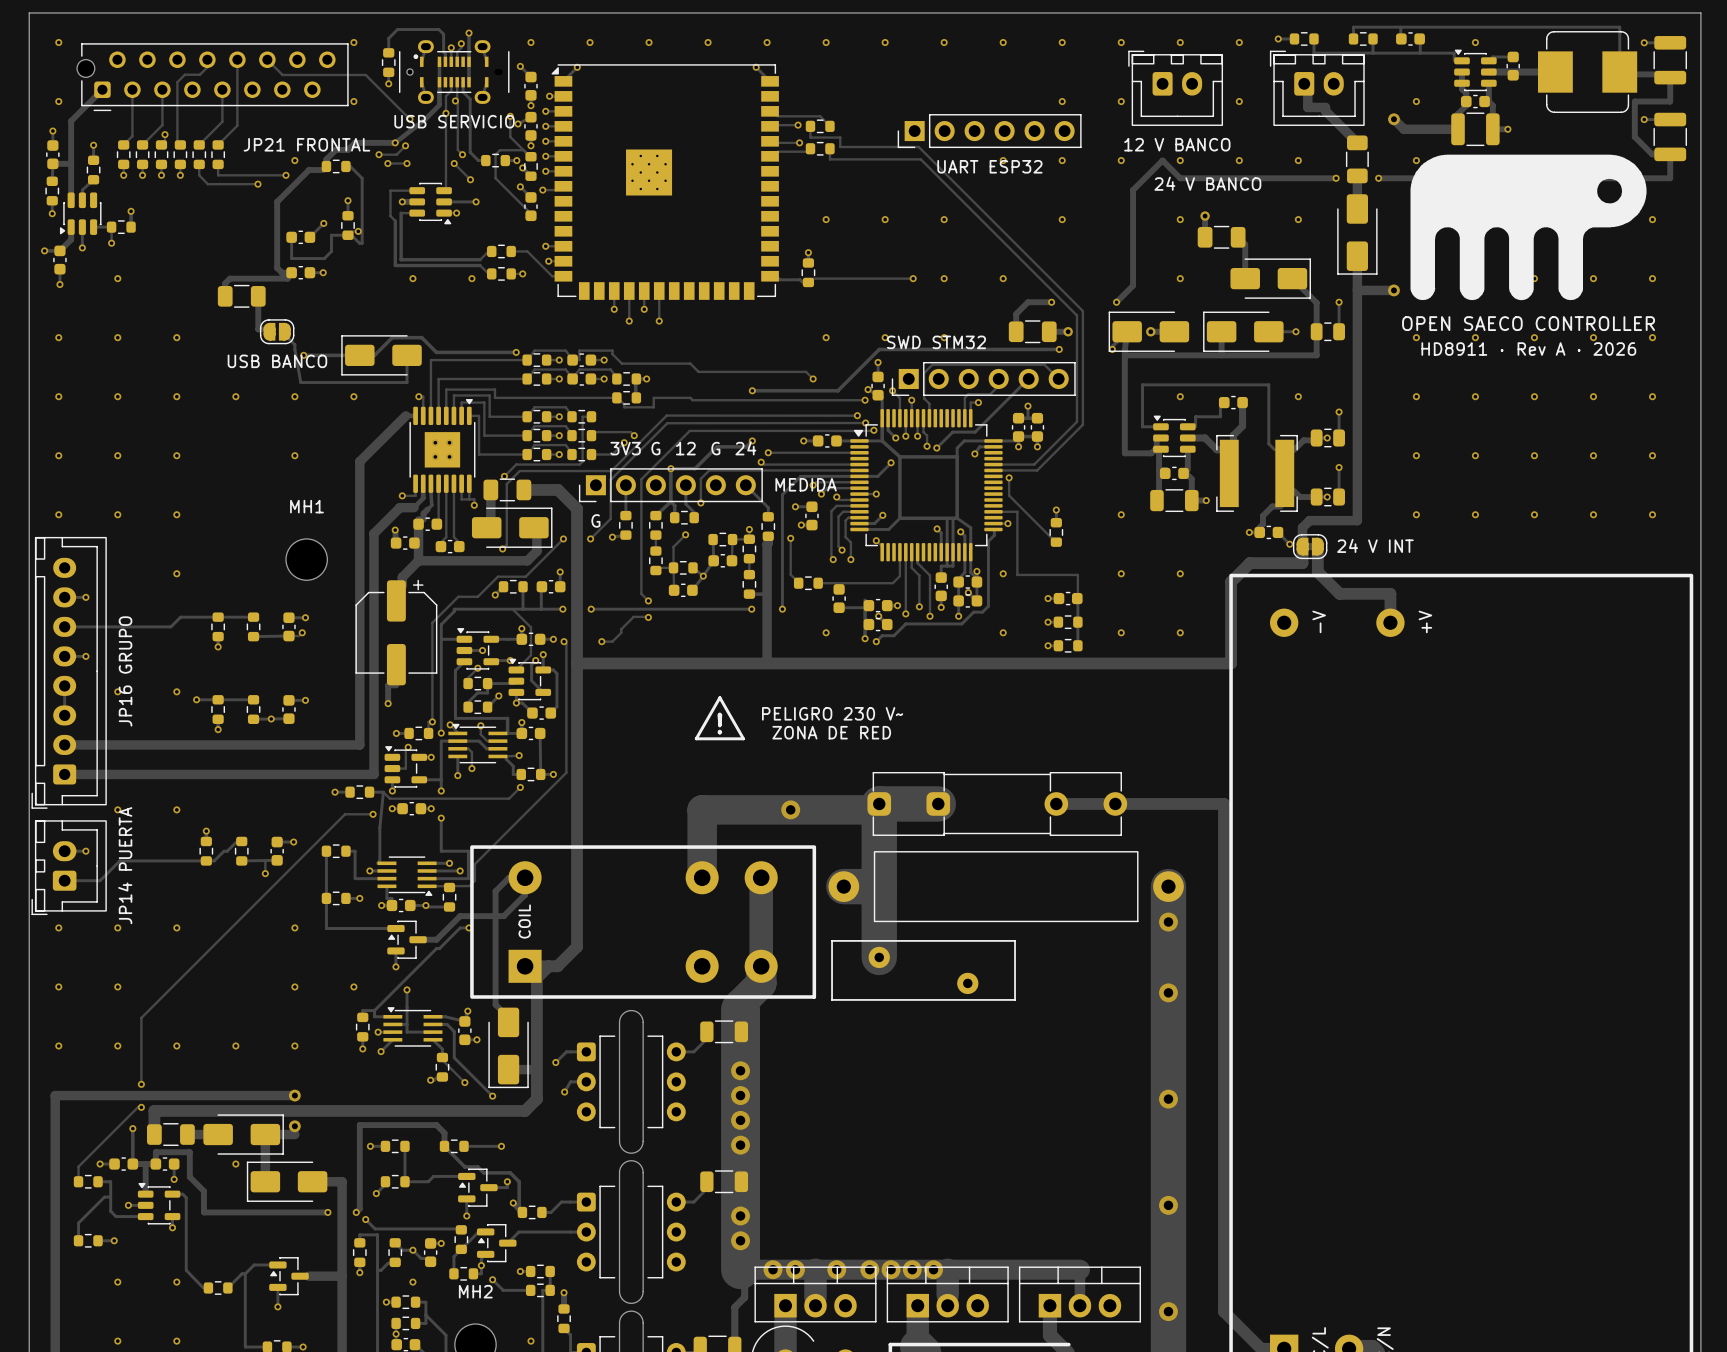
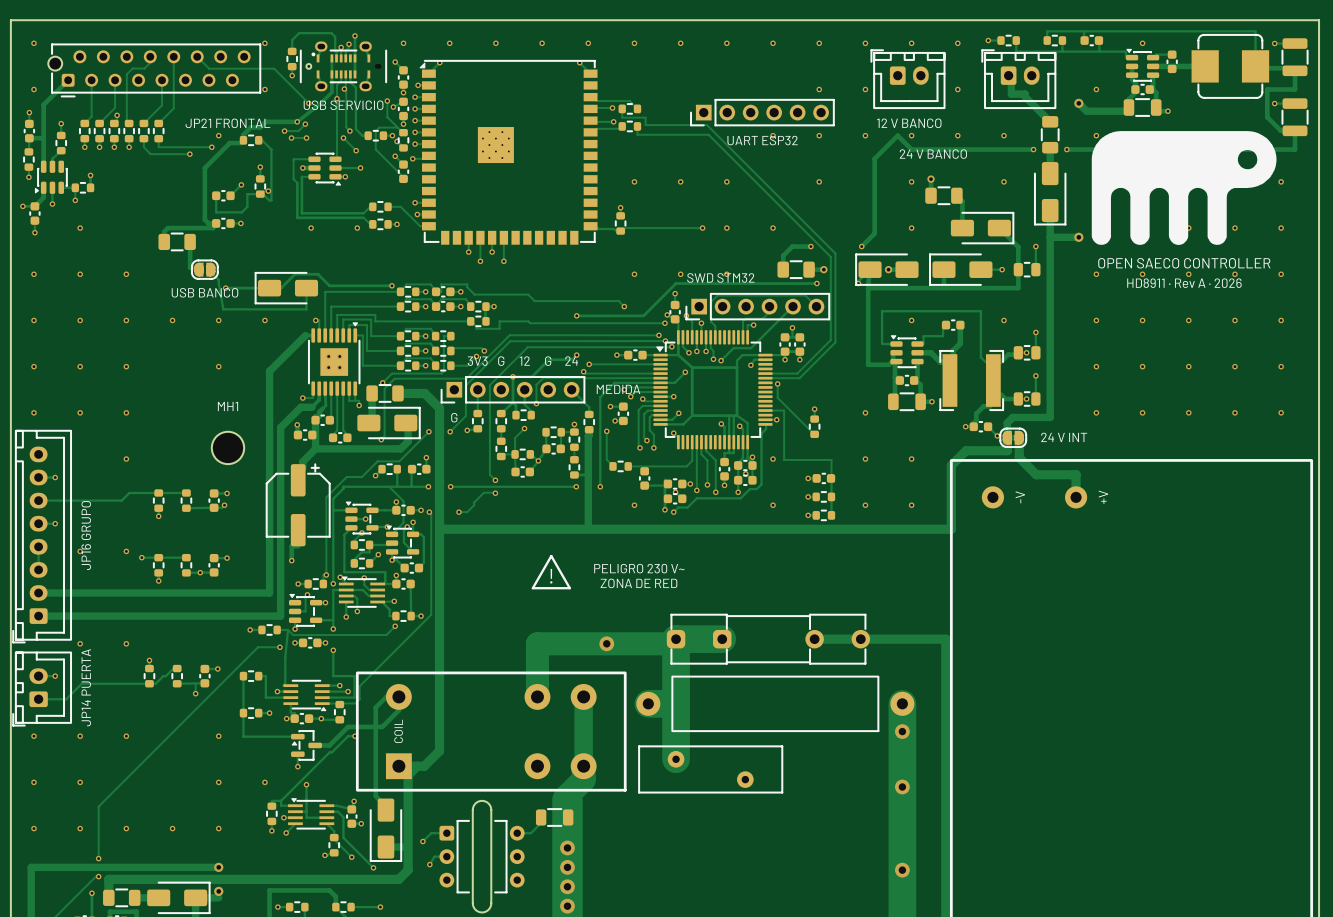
part footprint: [1451, 112, 1500, 147] -> [1123, 98, 1162, 117]

